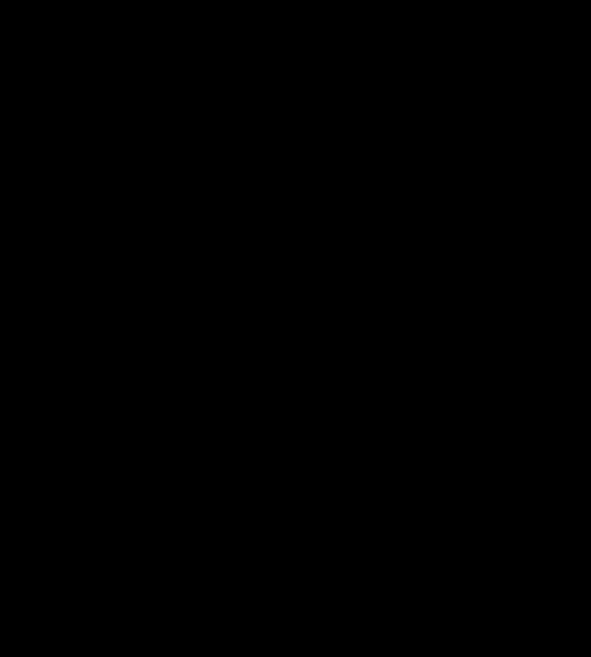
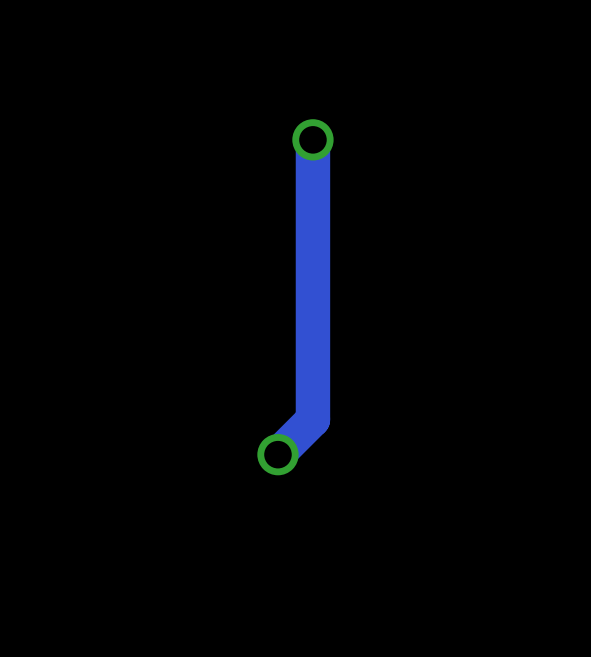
track: none -> (312, 139) (312, 419) (277, 454)
via: none -> (312, 139)
via: none -> (277, 454)

